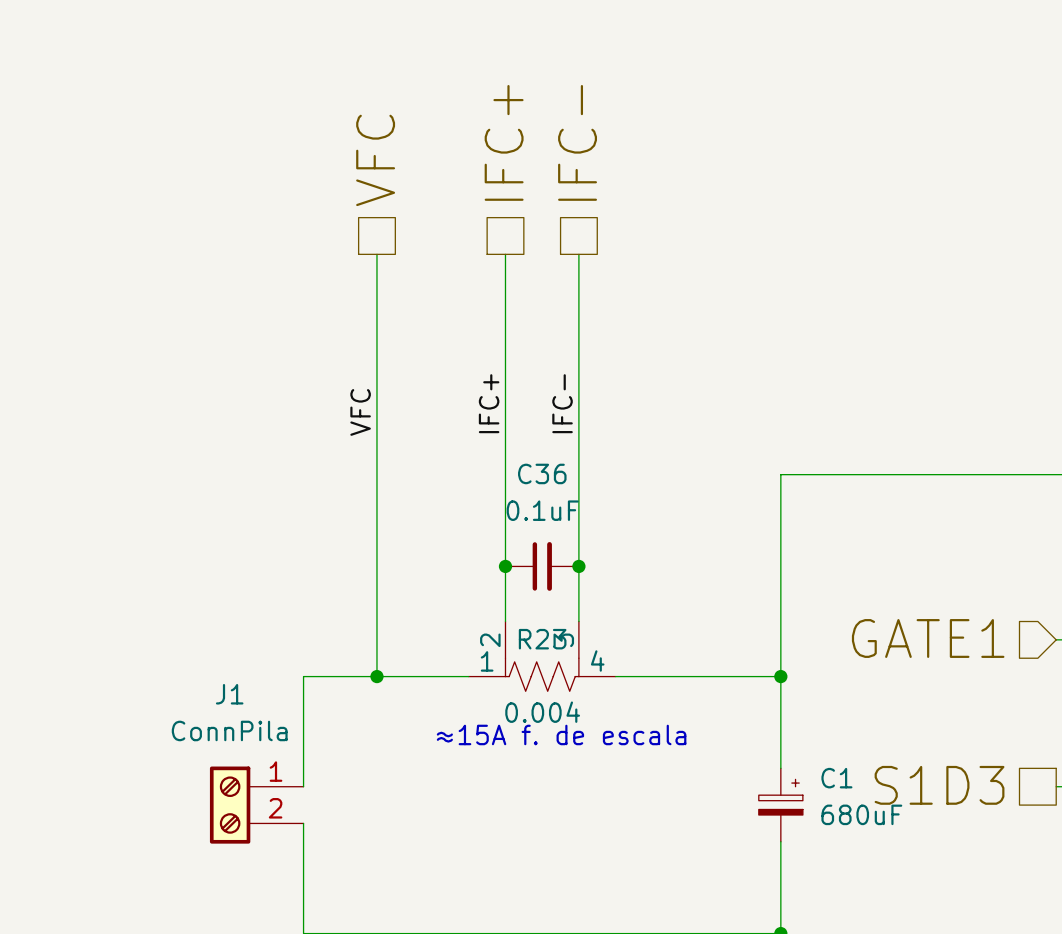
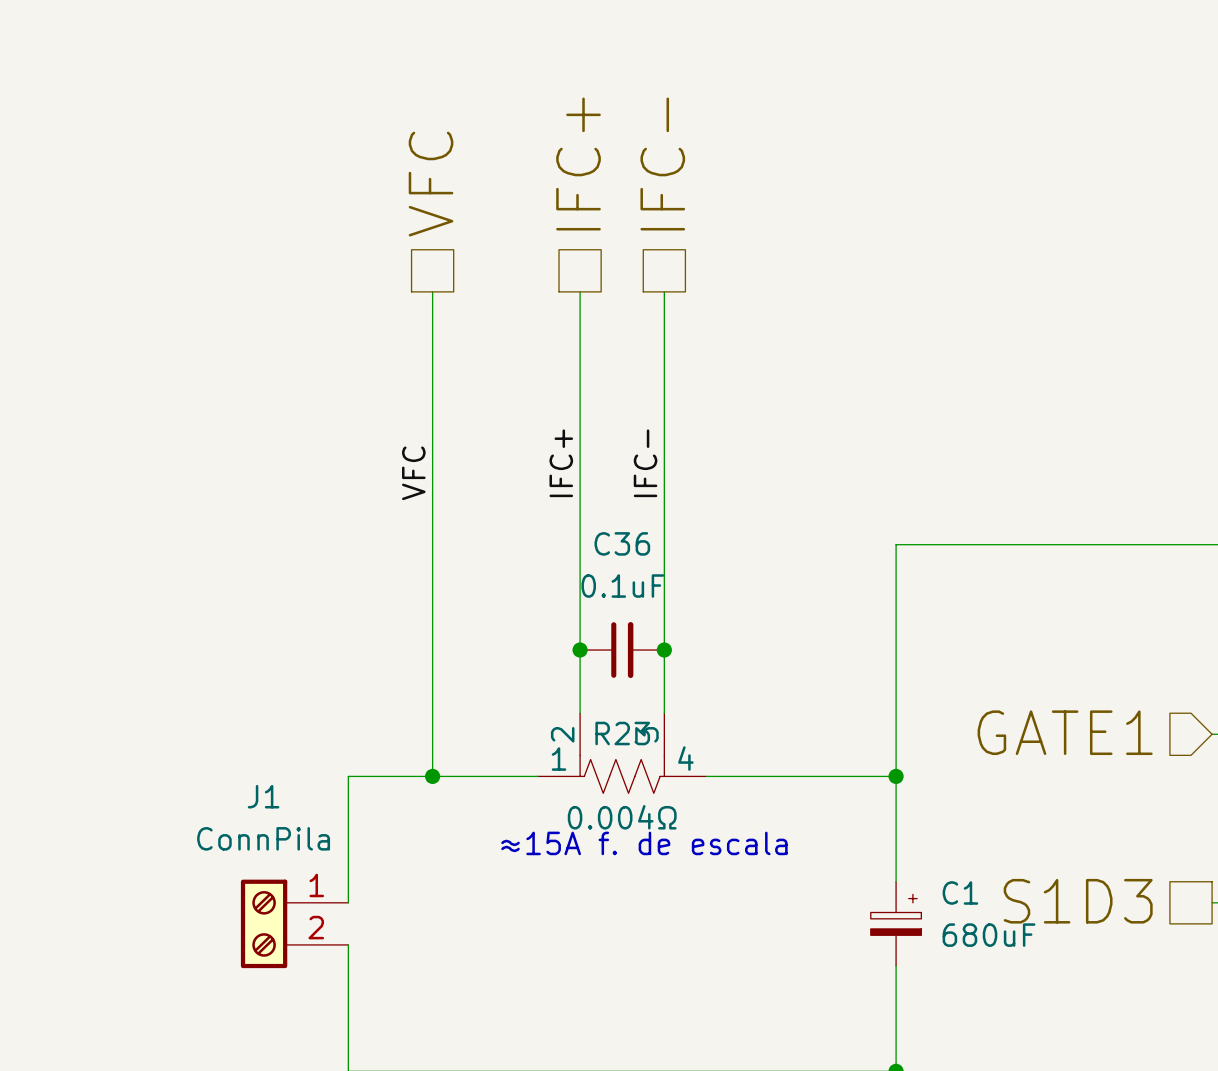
R23 value: 0.004 (542, 712) -> 0.004Ω (622, 817)

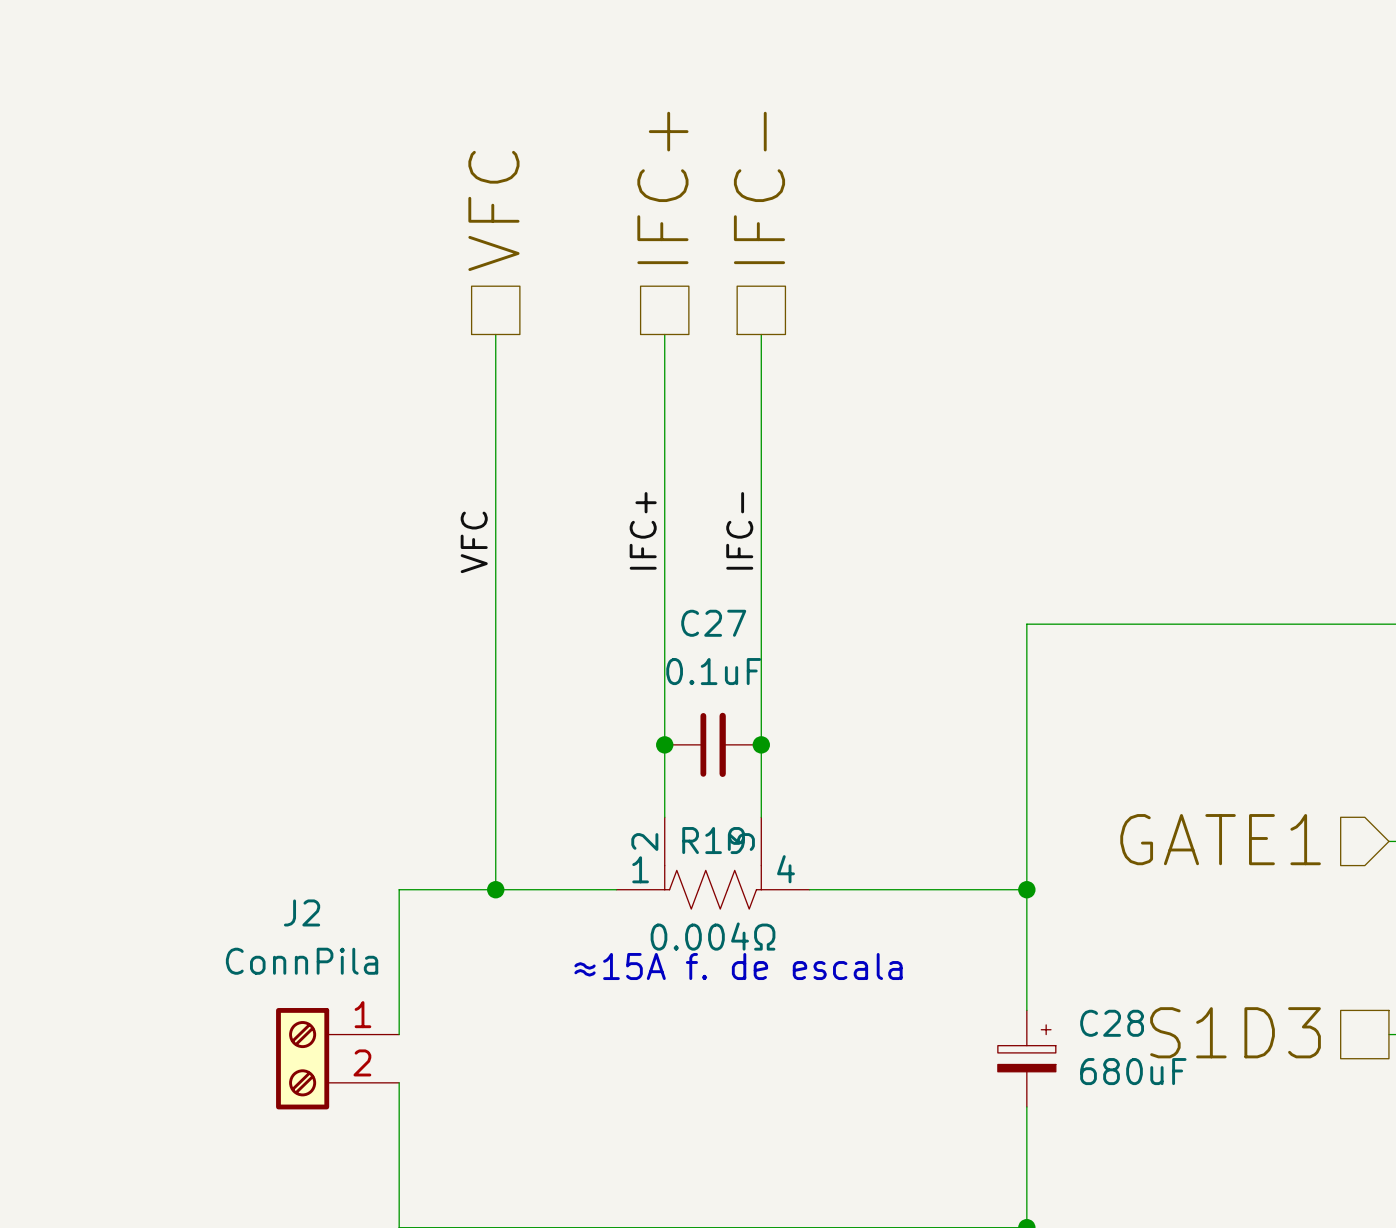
C36 name: C36 (622, 543) -> C27 (713, 623)
R23 name: R23 (622, 733) -> R19 (713, 840)
J1 name: J1 (263, 796) -> J2 (302, 912)
C1 name: C1 (960, 892) -> C28 (1112, 1023)

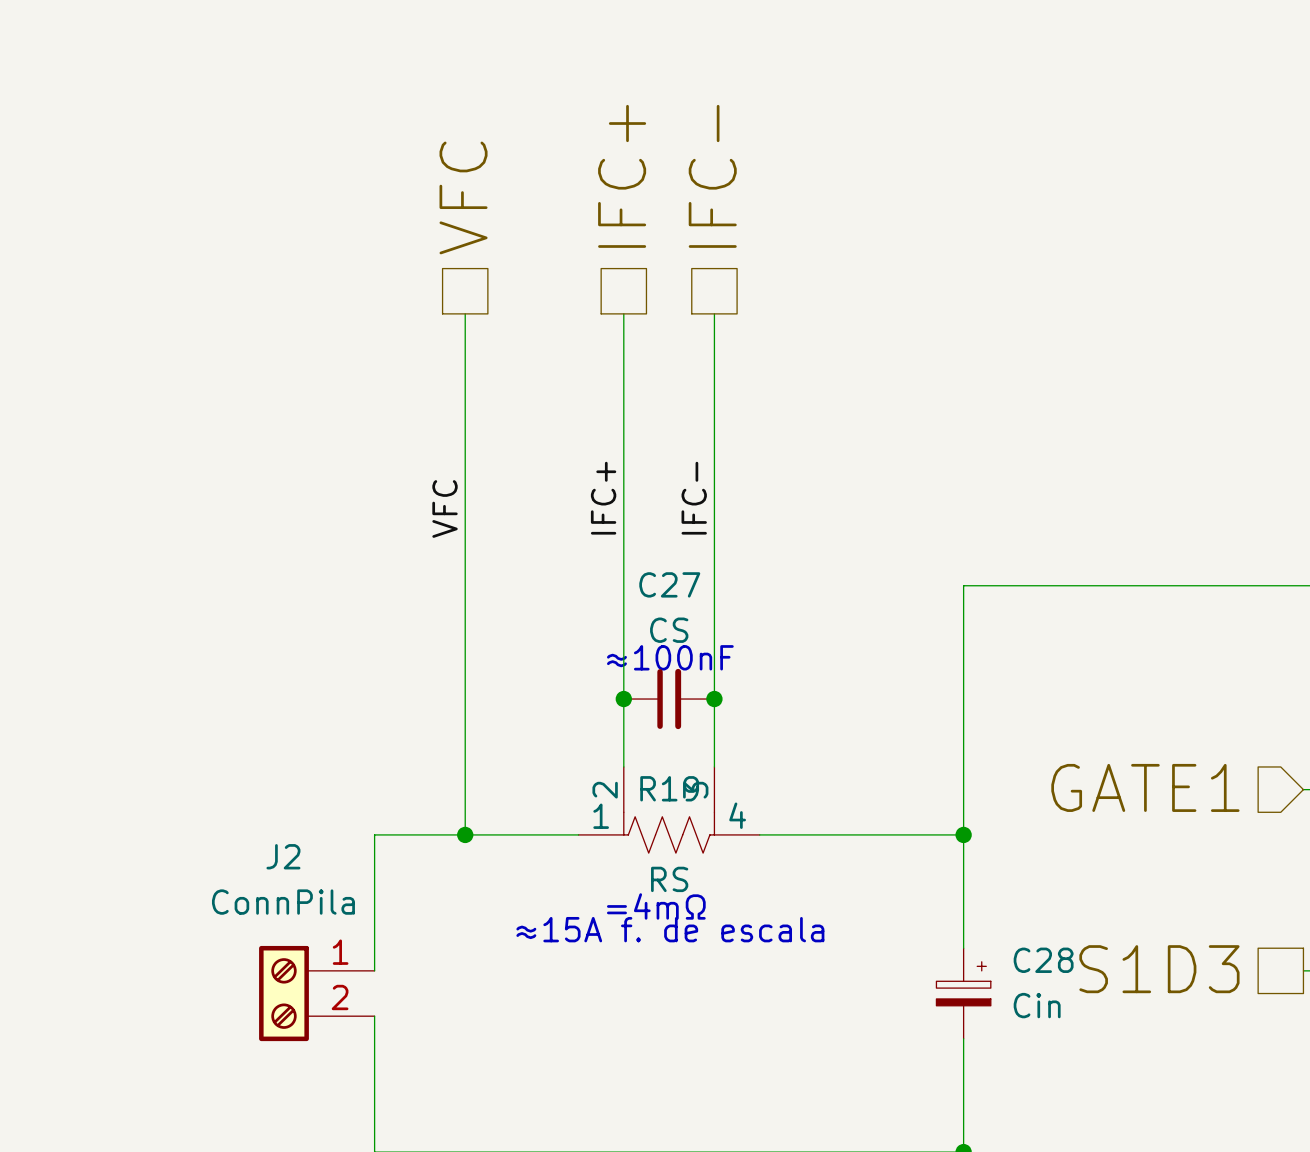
C27 value: 0.1uF (713, 671) -> CS (669, 630)
text: none -> ≈100nF (670, 657)
R19 value: 0.004Ω (713, 936) -> RS (669, 879)
text: none -> =4mΩ (656, 906)
text position: ≈15A f. de escala (738, 966) -> ≈15A f. de escala (670, 929)
C28 value: 680uF (1133, 1071) -> Cin (1037, 1005)

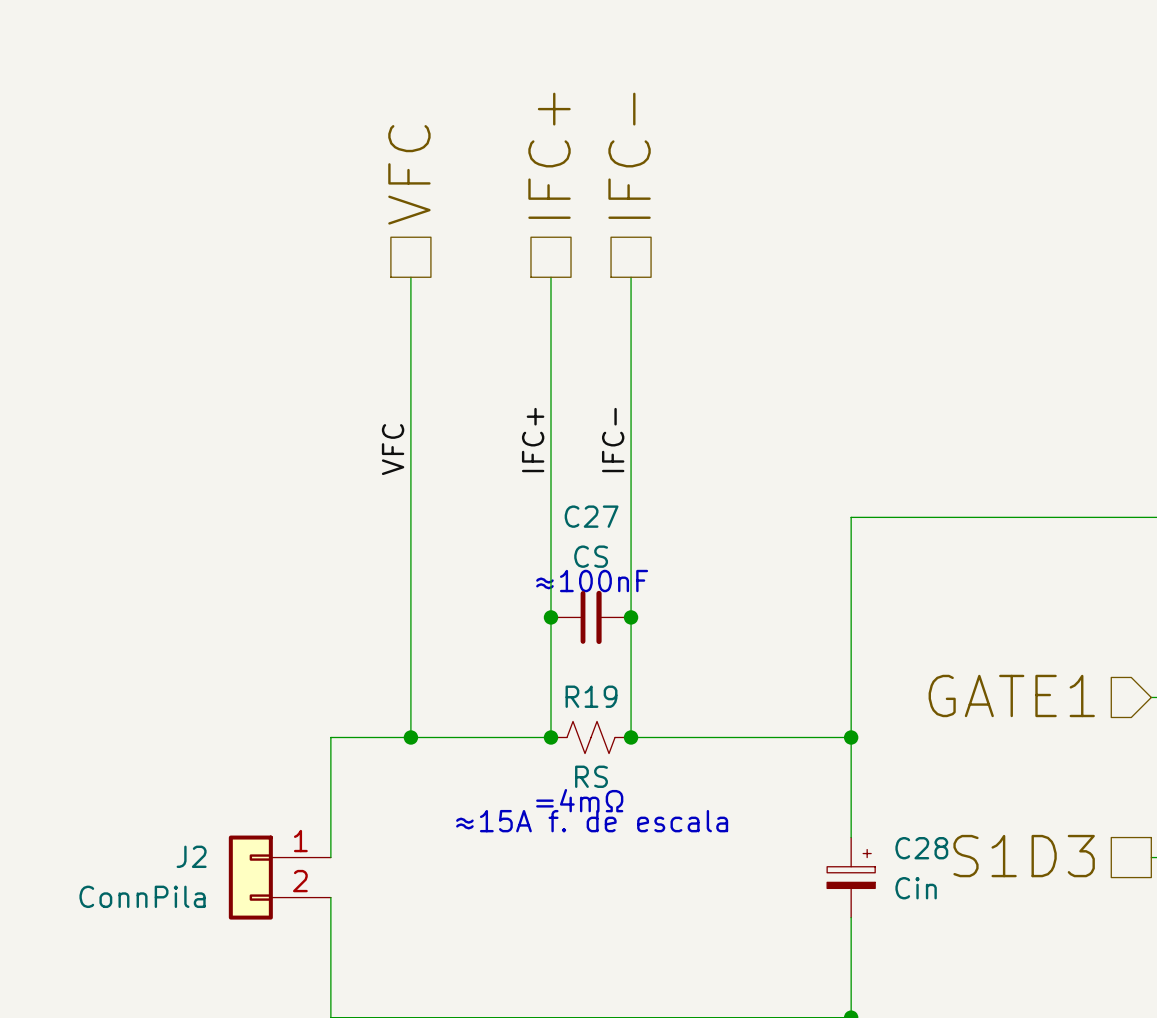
R19 symbol: [578, 766, 760, 854] -> [550, 721, 632, 754]
junction: none -> (550, 737)
junction: none -> (631, 737)
J2 name position: J2 (283, 856) -> J2 (191, 856)
J2 value position: ConnPila (283, 902) -> ConnPila (142, 896)
J2 symbol: [259, 945, 375, 1042] -> [228, 835, 331, 920]

